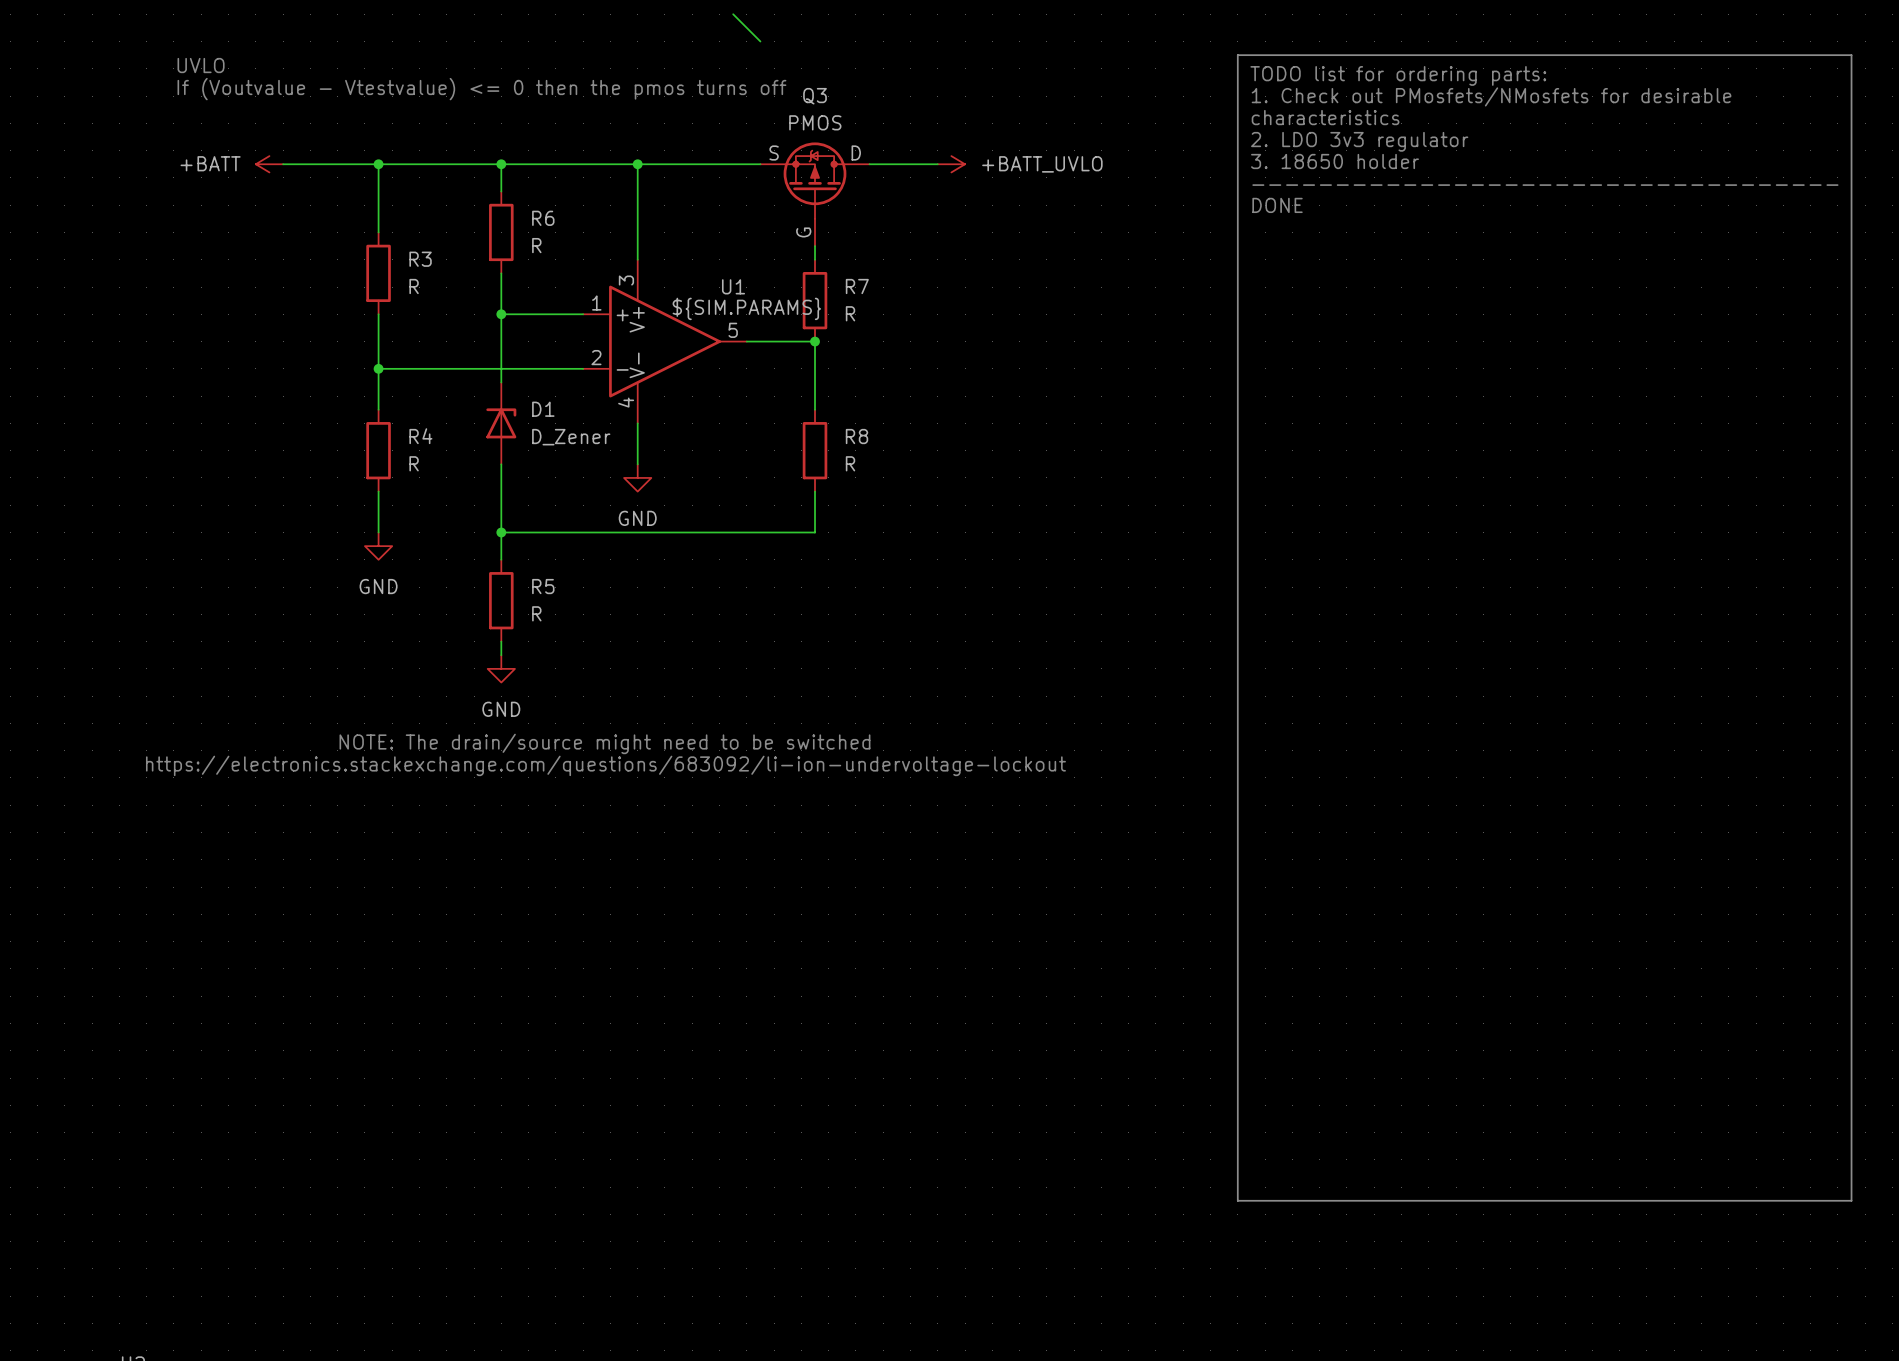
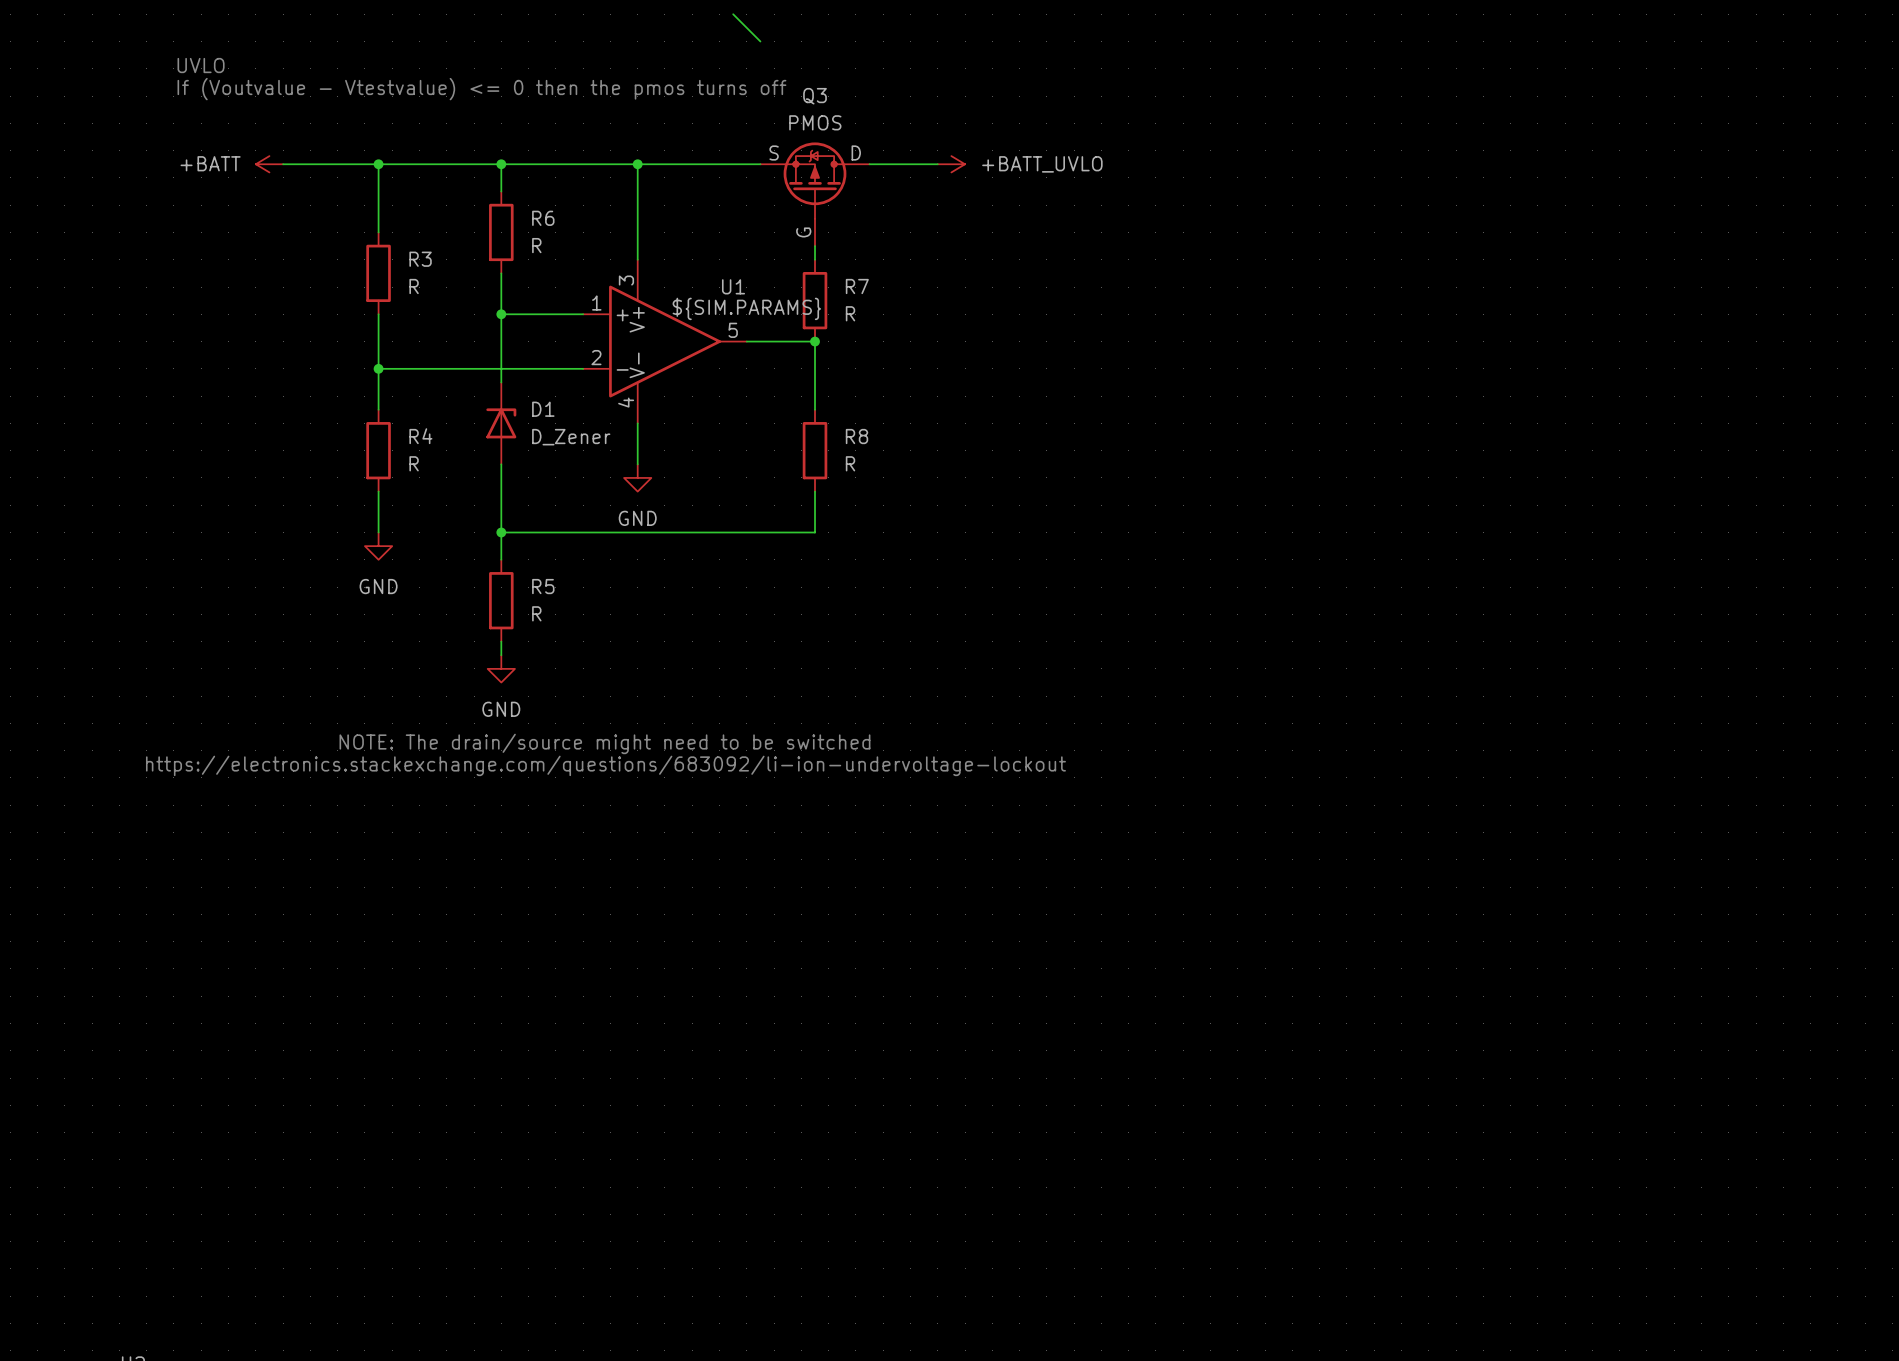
line: (1237, 55) (1851, 55) (1851, 1200) (1237, 1200) (1237, 55) -> none
text: TODO list for ordering parts: (1398, 75) -> none
text: 1. Check out PMosfets/NMosfets for desirable (1491, 96) -> none
text: characteristics (1325, 117) -> none
text: 2. LDO 3v3 regulator (1359, 141) -> none
text: 3. 18650 holder (1335, 161) -> none
text: ----------------------------------- (1545, 185) -> none
text: DONE (1277, 205) -> none

